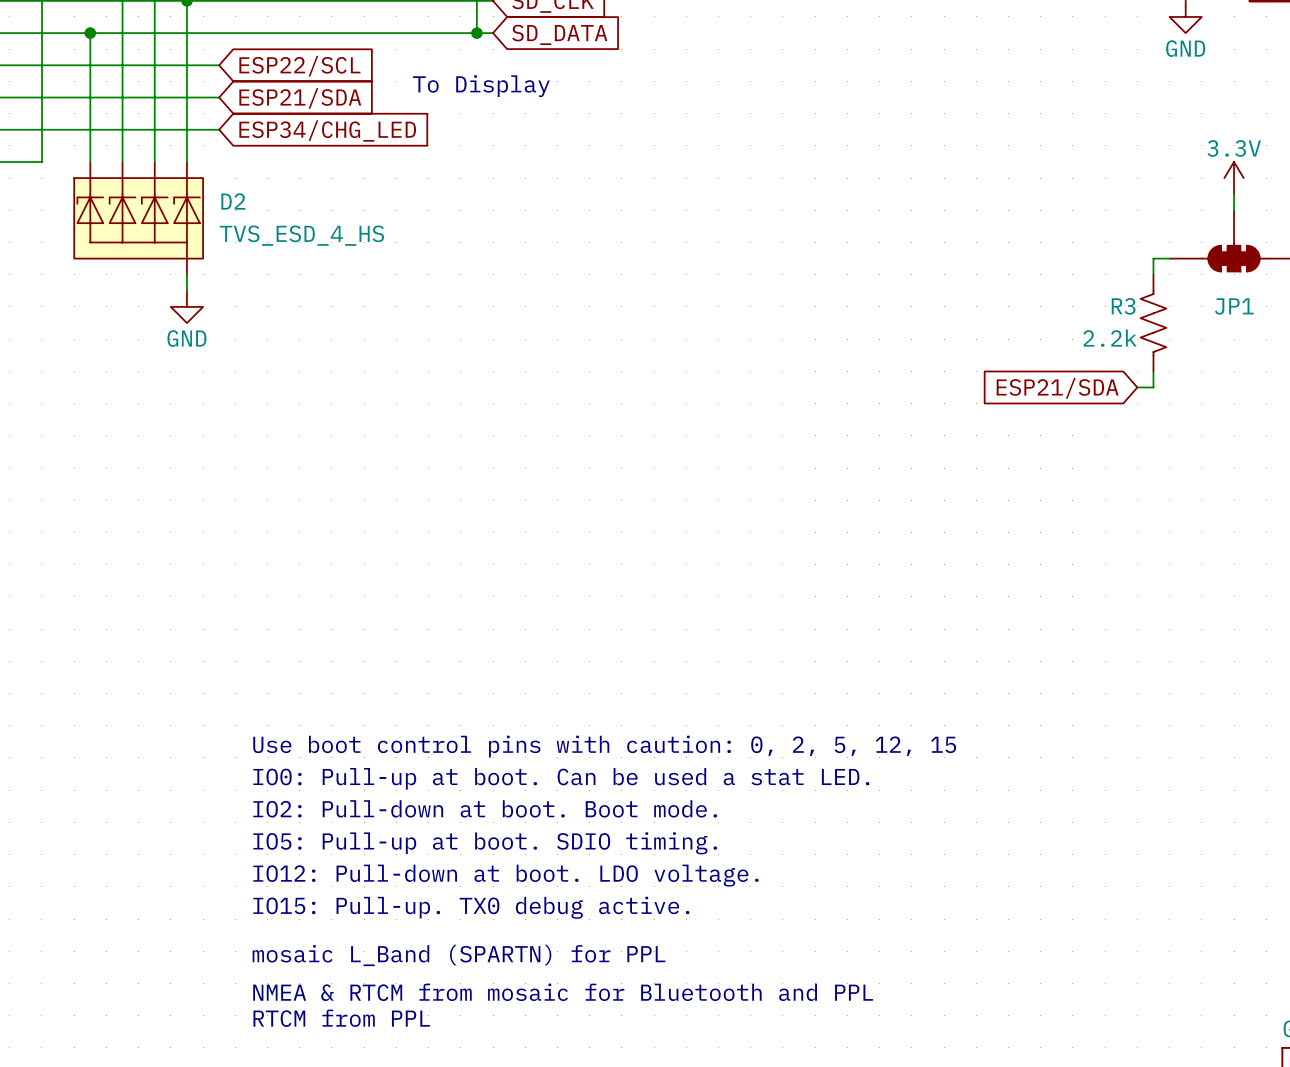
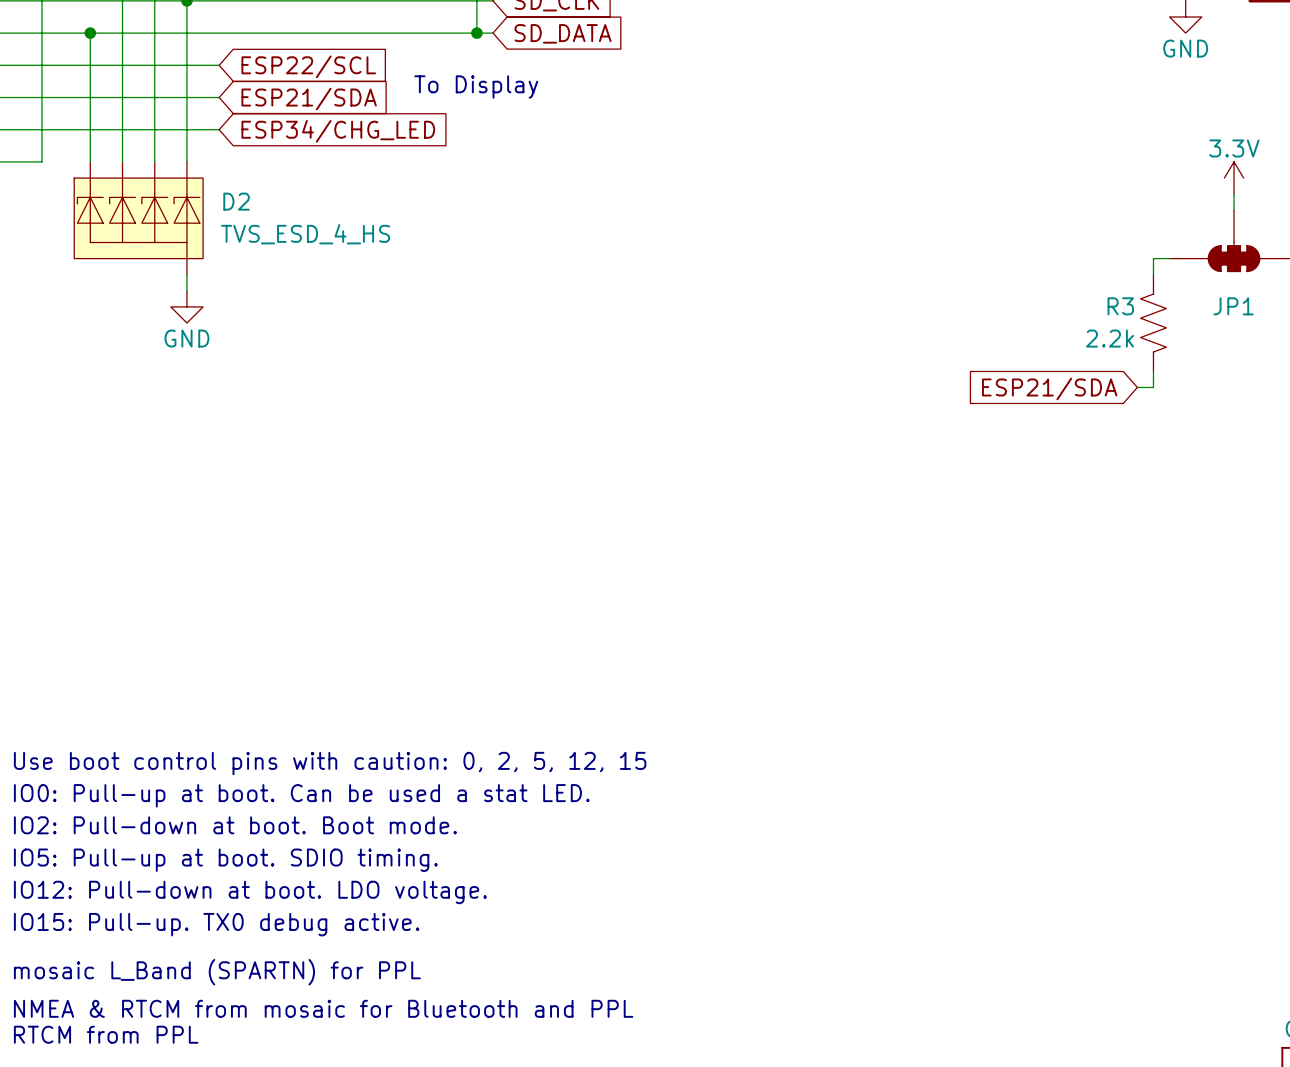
text position: Use boot control pins with caution: 0, 2, 5, 12, 15 (604, 746) -> Use boot control pins with caution: 0, 2, 5, 12, 15 (330, 763)
text position: IO0: Pull-up at boot. Can be used a stat LED. (561, 778) -> IO0: Pull-up at boot. Can be used a stat LED. (301, 795)
text position: IO2: Pull-down at boot. Boot mode. (485, 808) -> IO2: Pull-down at boot. Boot mode. (235, 825)
text position: IO5: Pull-up at boot. SDIO timing. (485, 843) -> IO5: Pull-up at boot. SDIO timing. (225, 860)
text position: IO12: Pull-down at boot. LDO voltage. (505, 875) -> IO12: Pull-down at boot. LDO voltage. (250, 892)
text position: IO15: Pull-up. TX0 debug active. (471, 907) -> IO15: Pull-up. TX0 debug active. (216, 924)
text position: mosaic L_Band (SPARTN) for PPL (458, 955) -> mosaic L_Band (SPARTN) for PPL (217, 972)
text position: NMEA & RTCM from mosaic for Bluetooth and PPL (563, 992) -> NMEA & RTCM from mosaic for Bluetooth and PPL (323, 1008)
text position: RTCM from PPL (341, 1018) -> RTCM from PPL (106, 1034)

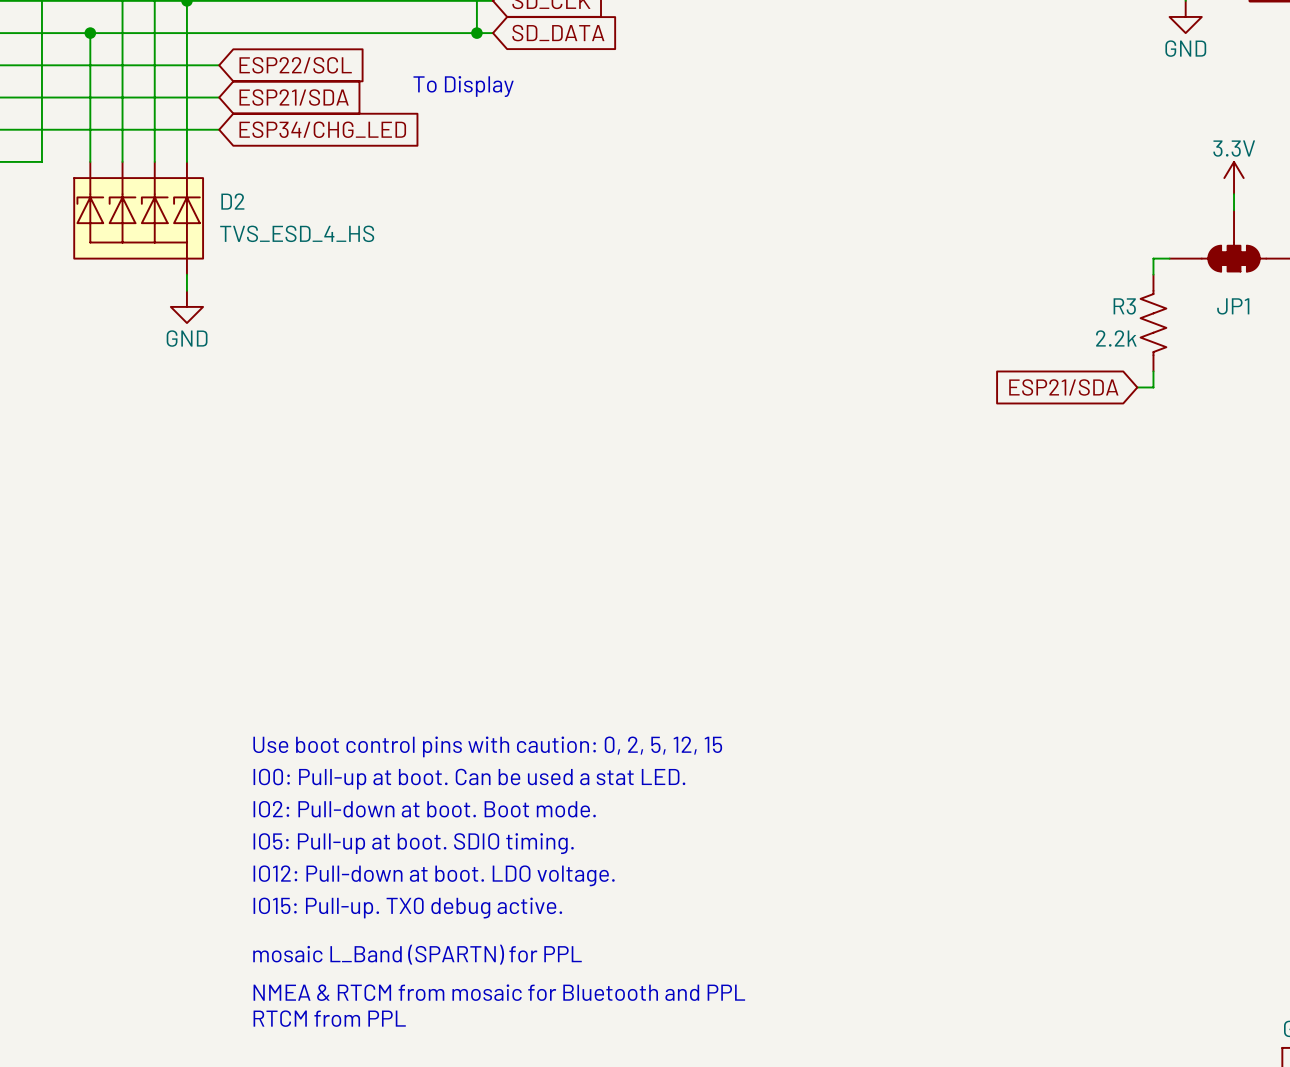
text position: Use boot control pins with caution: 0, 2, 5, 12, 15 (330, 763) -> Use boot control pins with caution: 0, 2, 5, 12, 15 (487, 746)
text position: IO0: Pull-up at boot. Can be used a stat LED. (301, 795) -> IO0: Pull-up at boot. Can be used a stat LED. (469, 779)
text position: IO2: Pull-down at boot. Boot mode. (235, 825) -> IO2: Pull-down at boot. Boot mode. (424, 809)
text position: IO5: Pull-up at boot. SDIO timing. (225, 860) -> IO5: Pull-up at boot. SDIO timing. (413, 843)
text position: IO12: Pull-down at boot. LDO voltage. (250, 892) -> IO12: Pull-down at boot. LDO voltage. (434, 875)
text position: IO15: Pull-up. TX0 debug active. (216, 924) -> IO15: Pull-up. TX0 debug active. (407, 908)
text position: mosaic L_Band (SPARTN) for PPL (217, 972) -> mosaic L_Band (SPARTN) for PPL (417, 954)
text position: NMEA & RTCM from mosaic for Bluetooth and PPL (323, 1008) -> NMEA & RTCM from mosaic for Bluetooth and PPL (499, 992)
text position: RTCM from PPL (106, 1034) -> RTCM from PPL (329, 1018)

